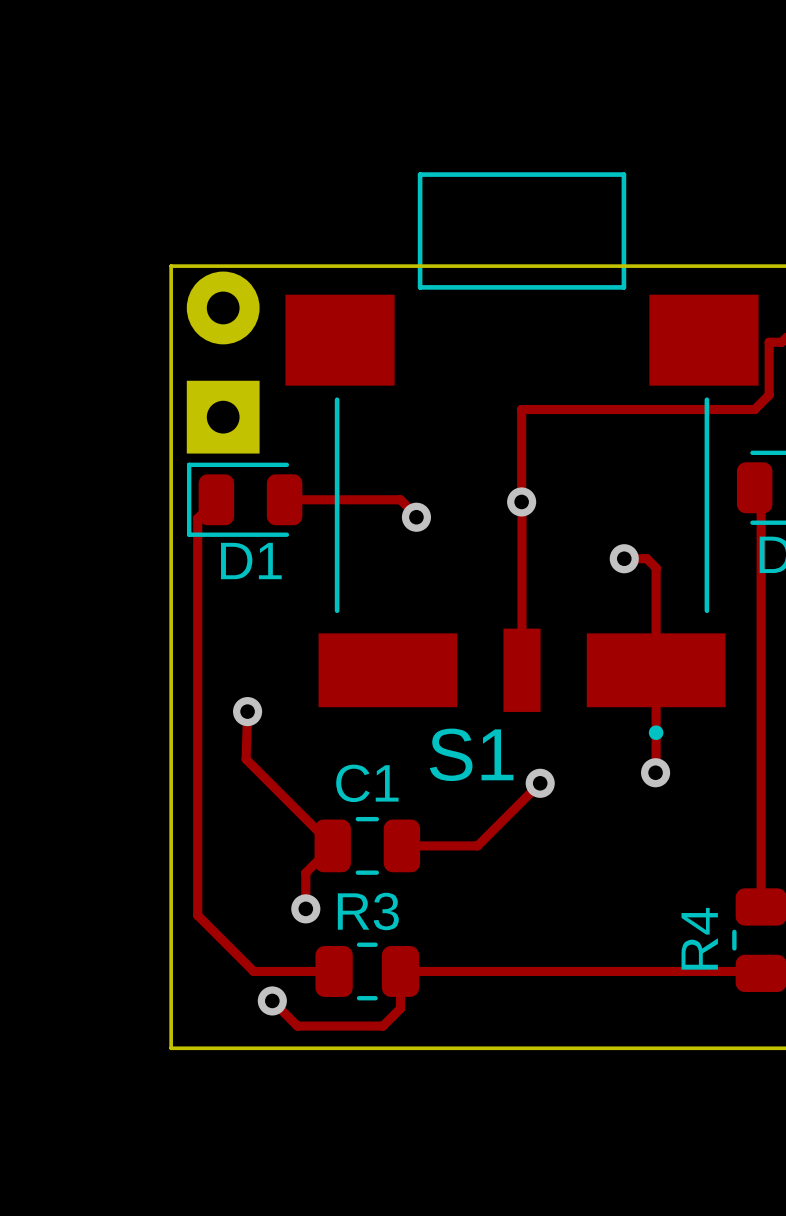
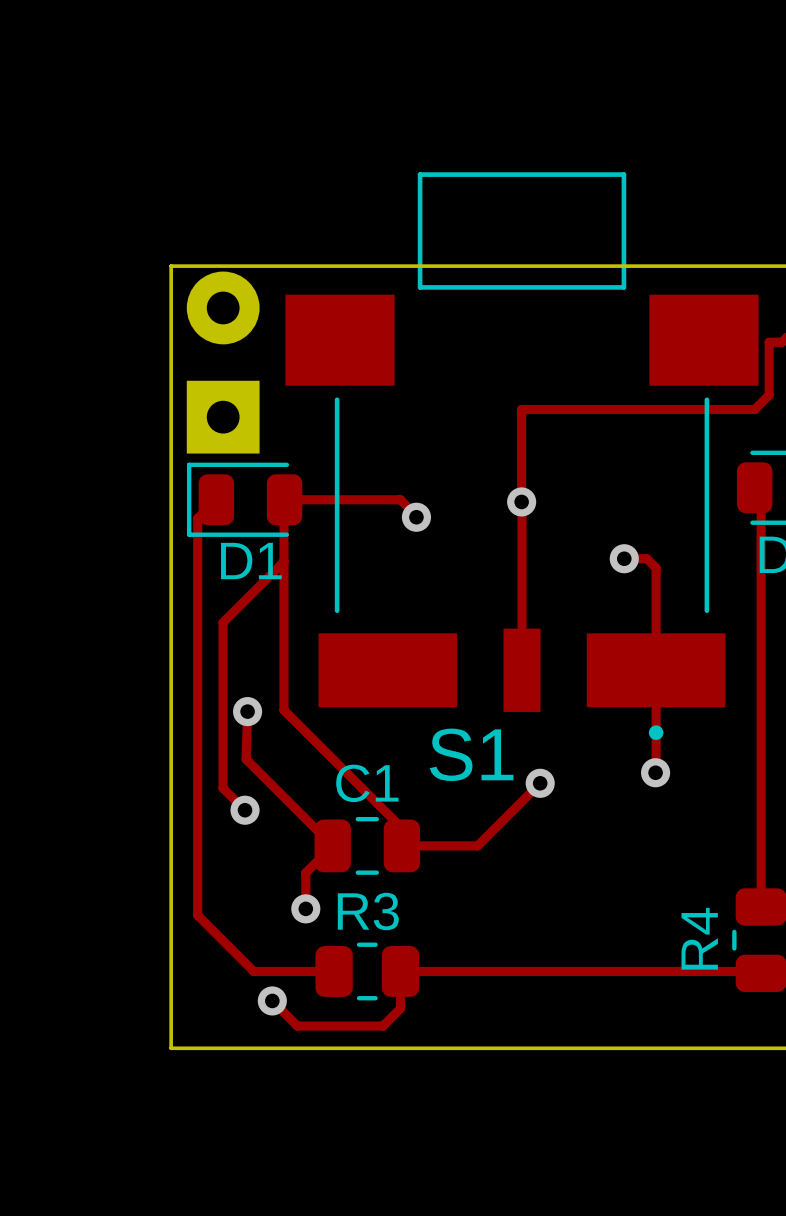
track: none -> (284, 499) (283, 710) (401, 828) (401, 845)
track: none -> (283, 561) (223, 622) (223, 788) (245, 810)
via: none -> (245, 810)

